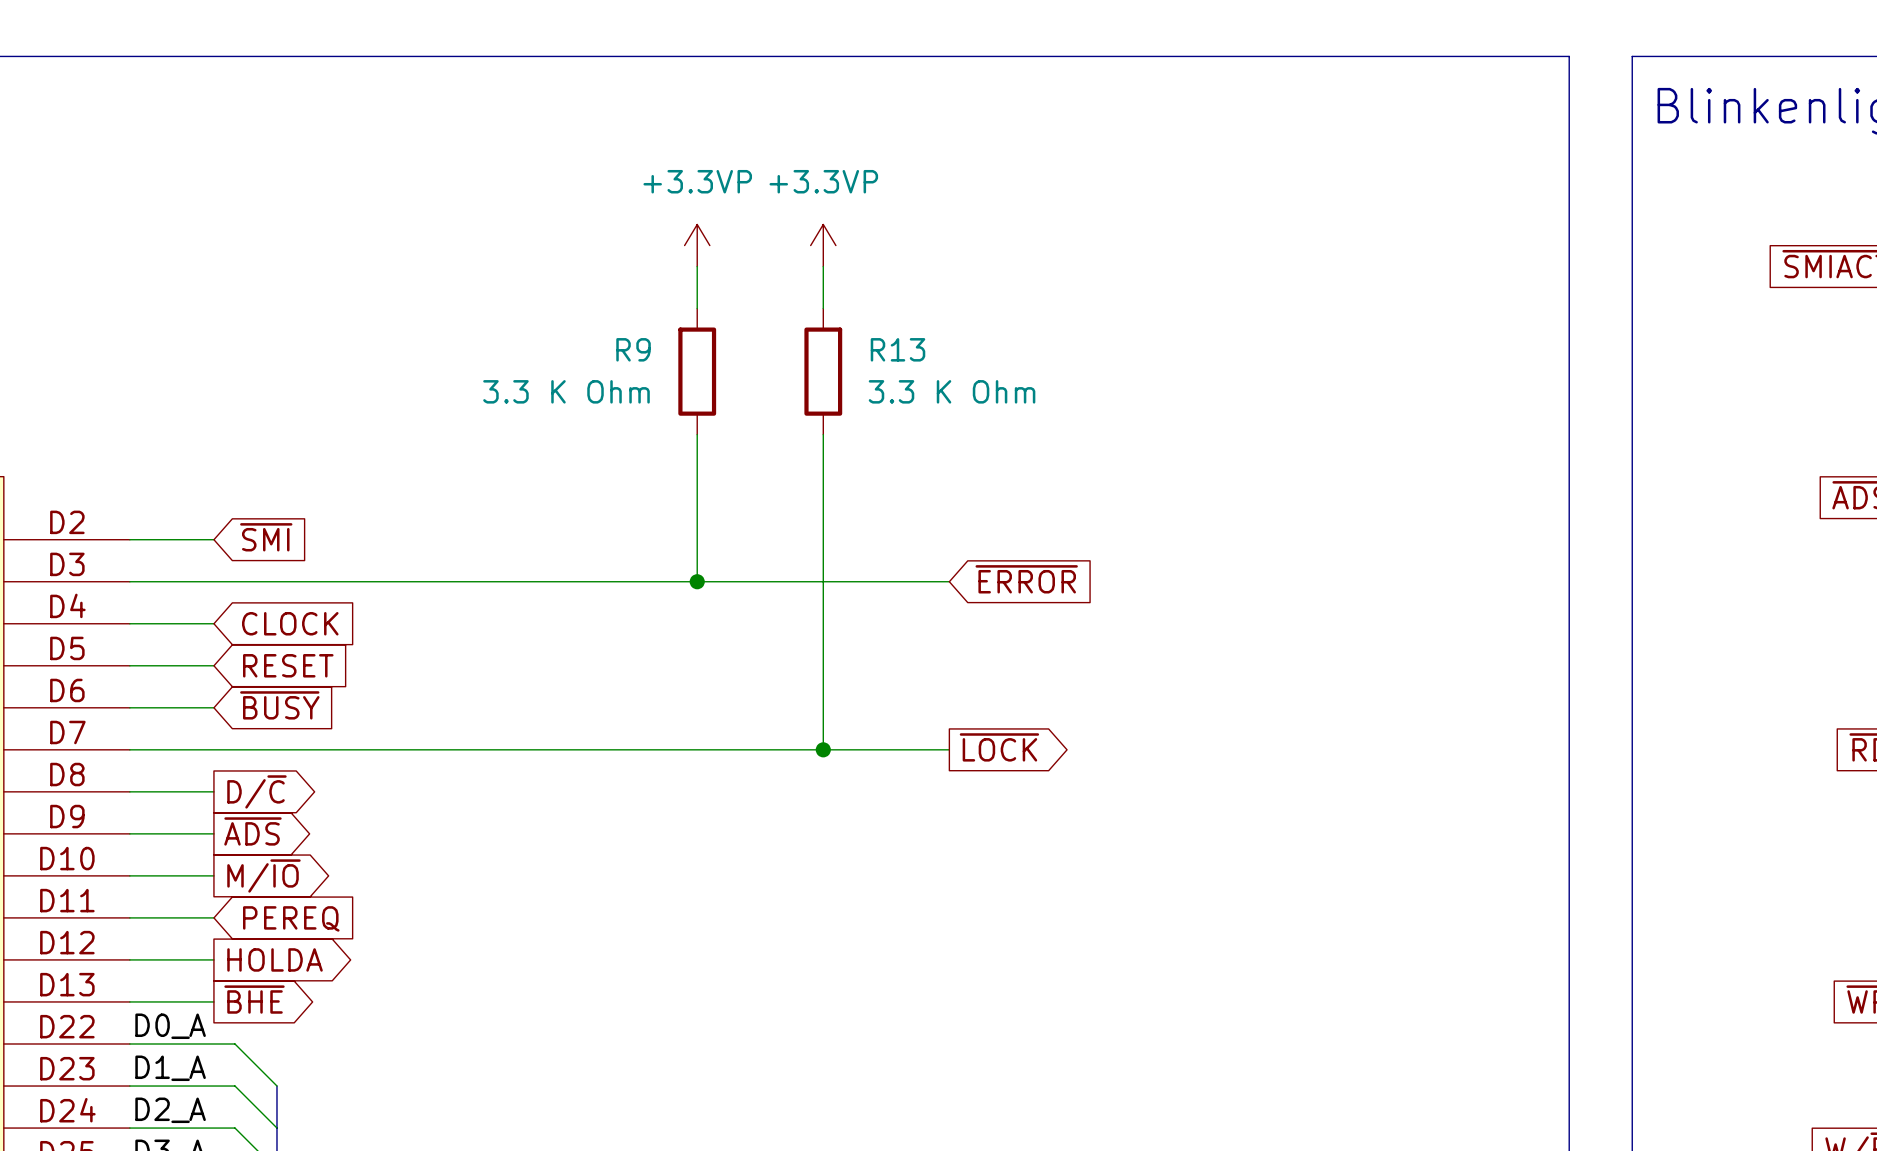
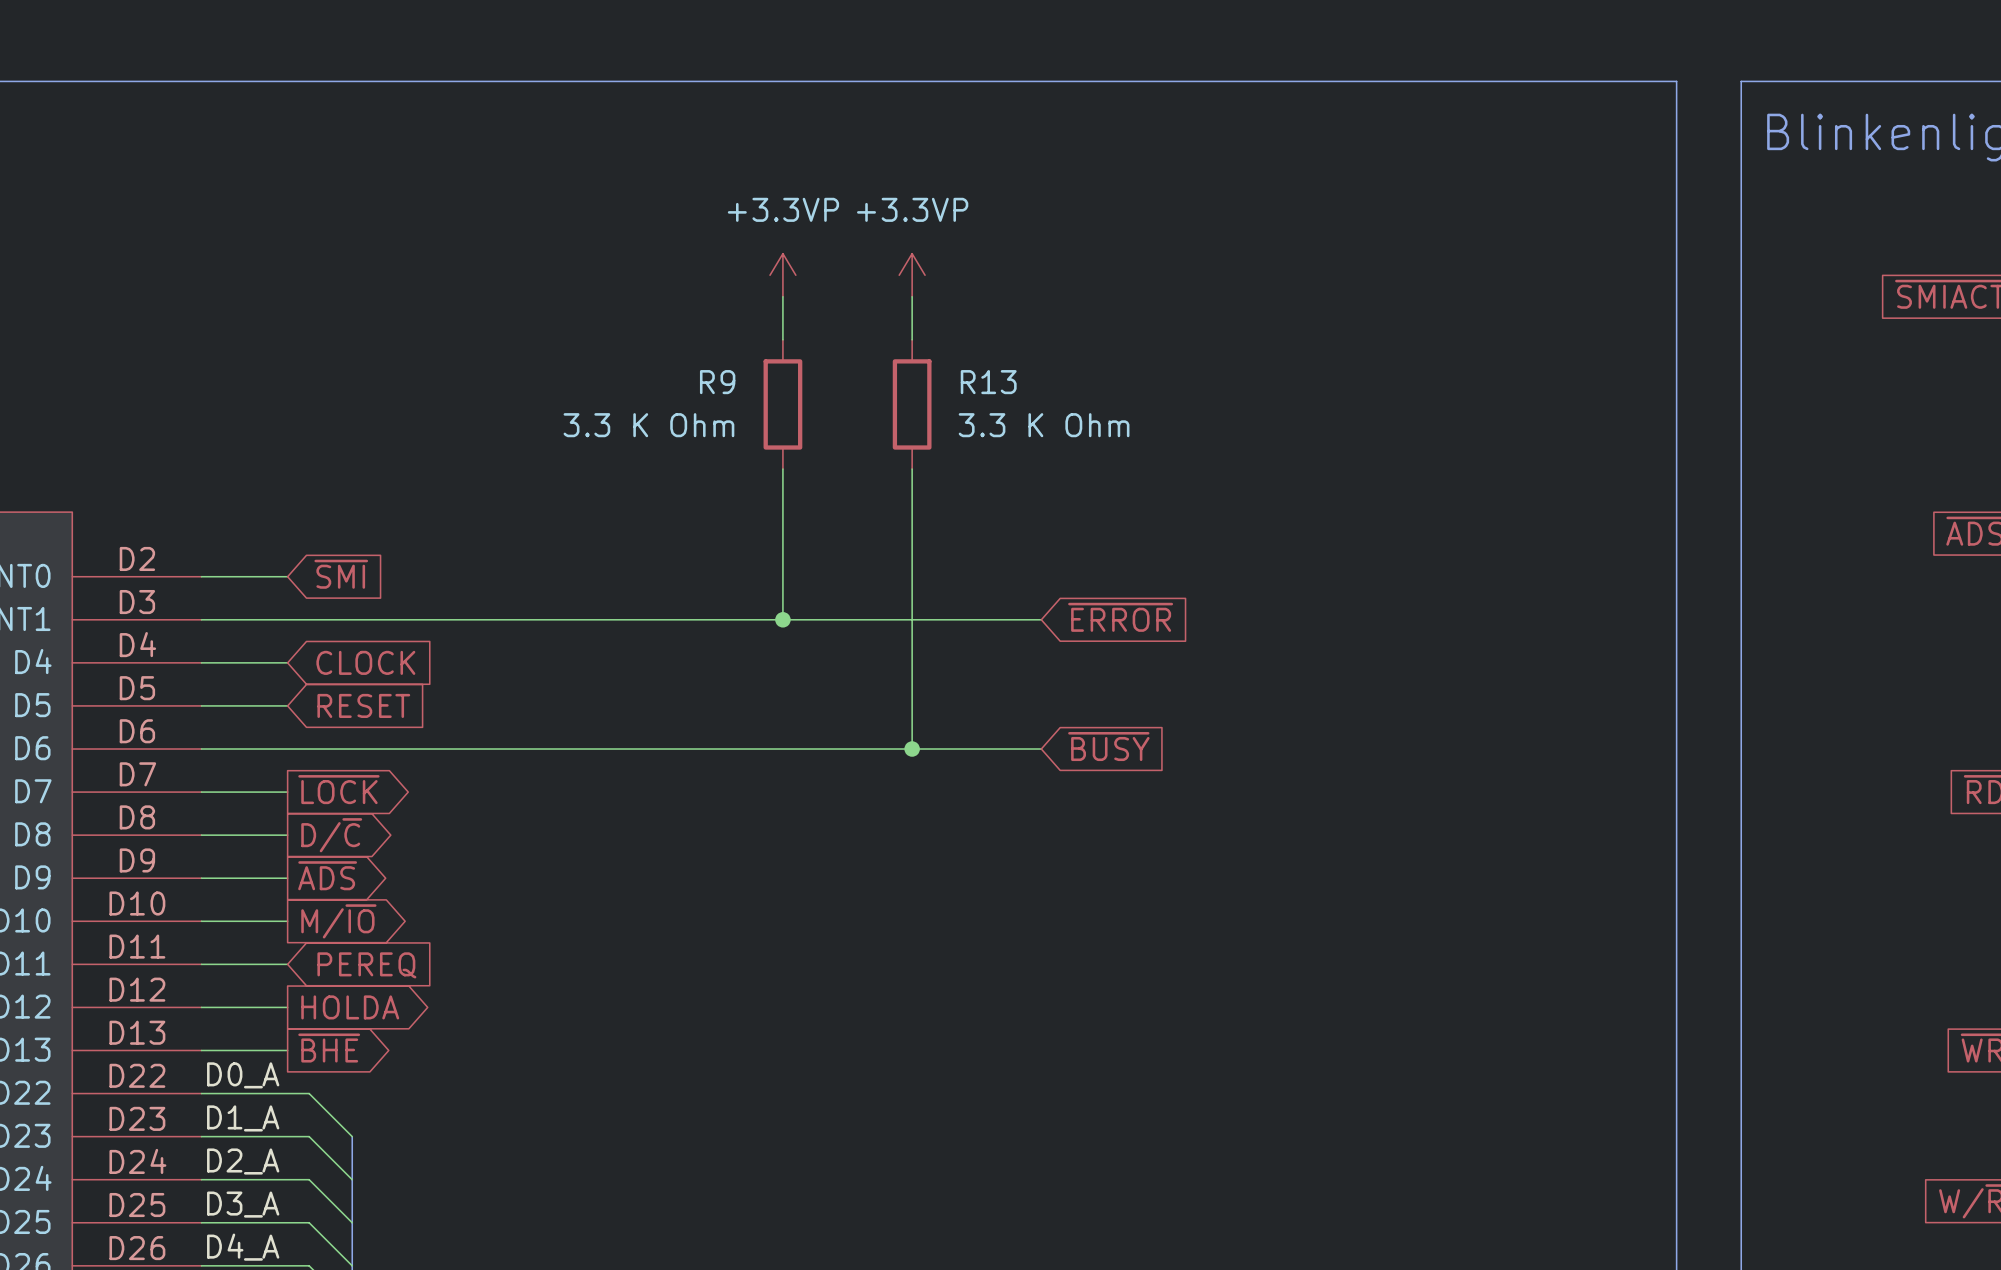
global label: ~{BUSY} (279, 705) -> none
global label: none -> ~{BUSY} (1108, 746)
wire: (823, 707) (823, 749) -> none
global label: none -> ~{LOCK} (338, 789)
global label: ~{LOCK} (999, 747) -> none
wire: (213, 749) (949, 749) -> (287, 749) (1041, 749)
junction position: (823, 749) -> (912, 749)

